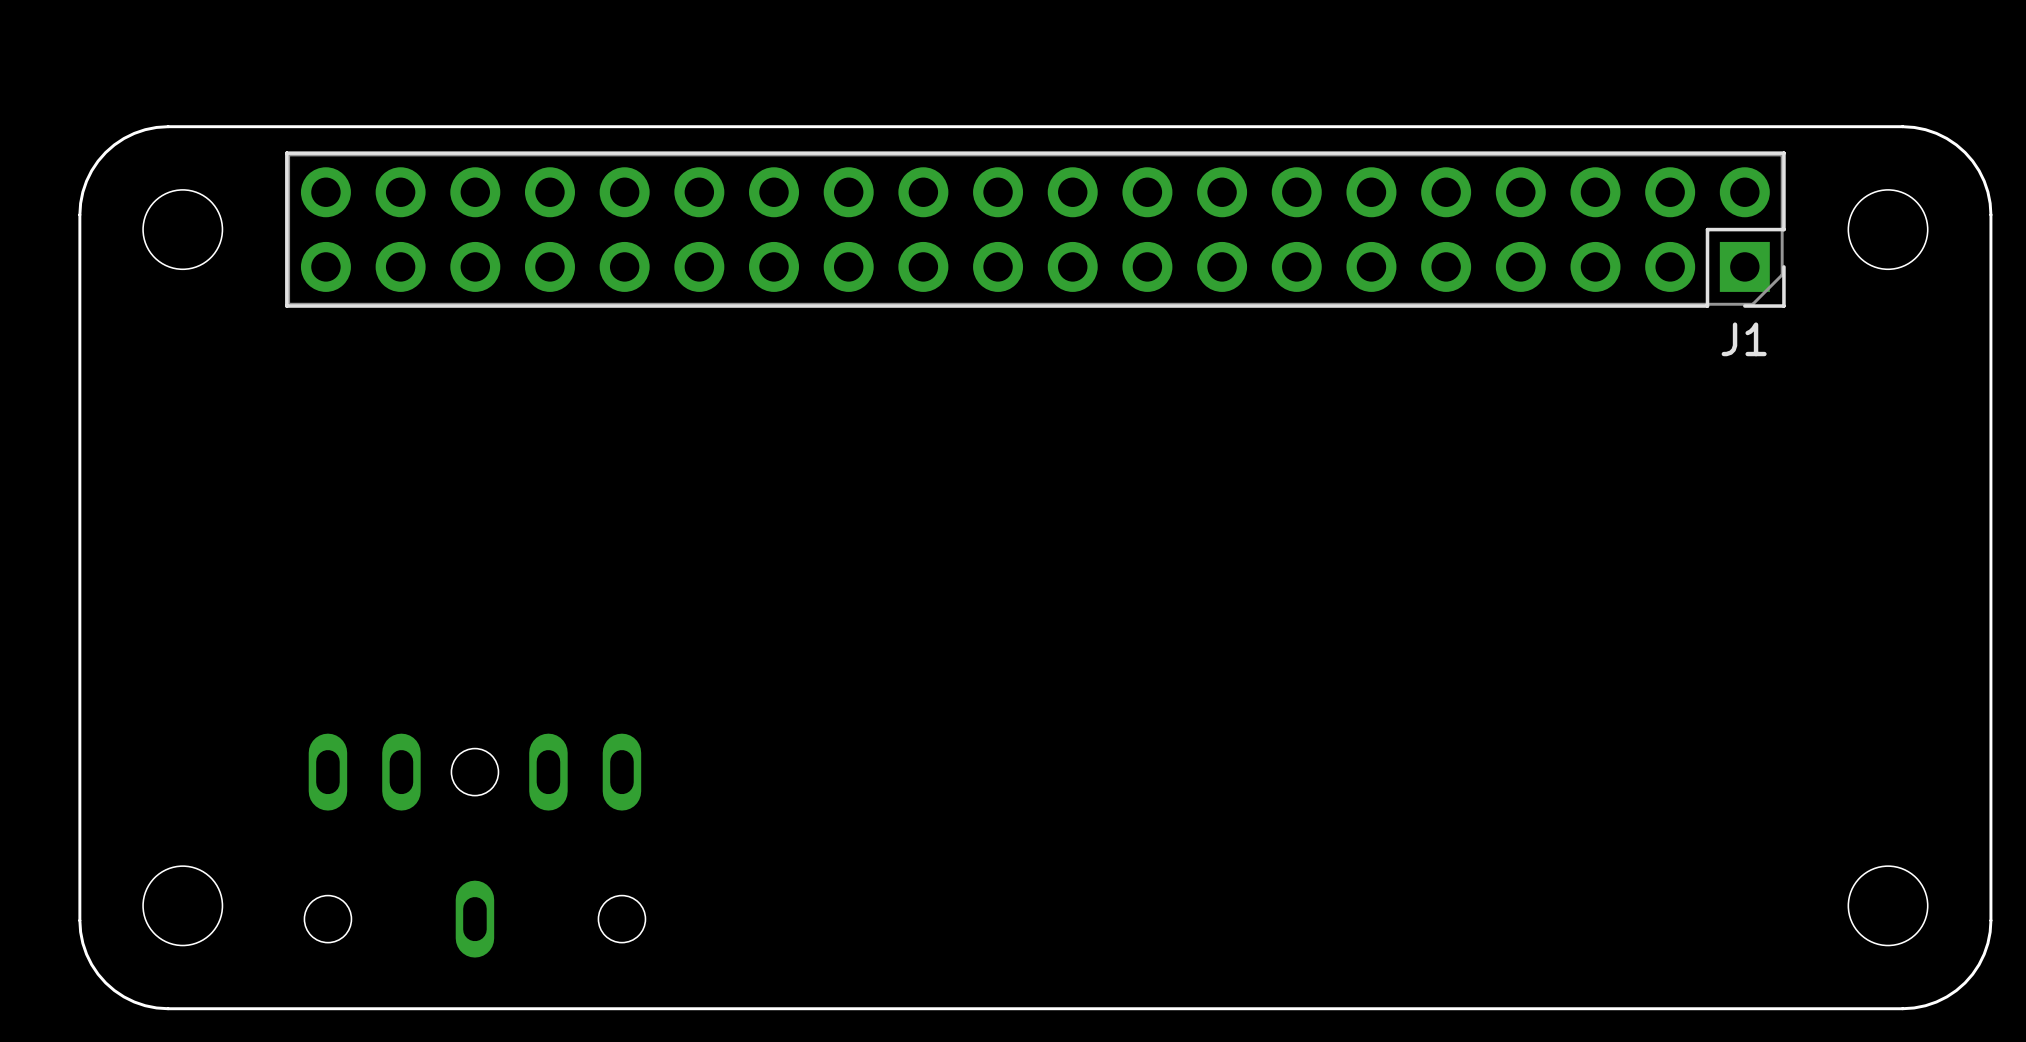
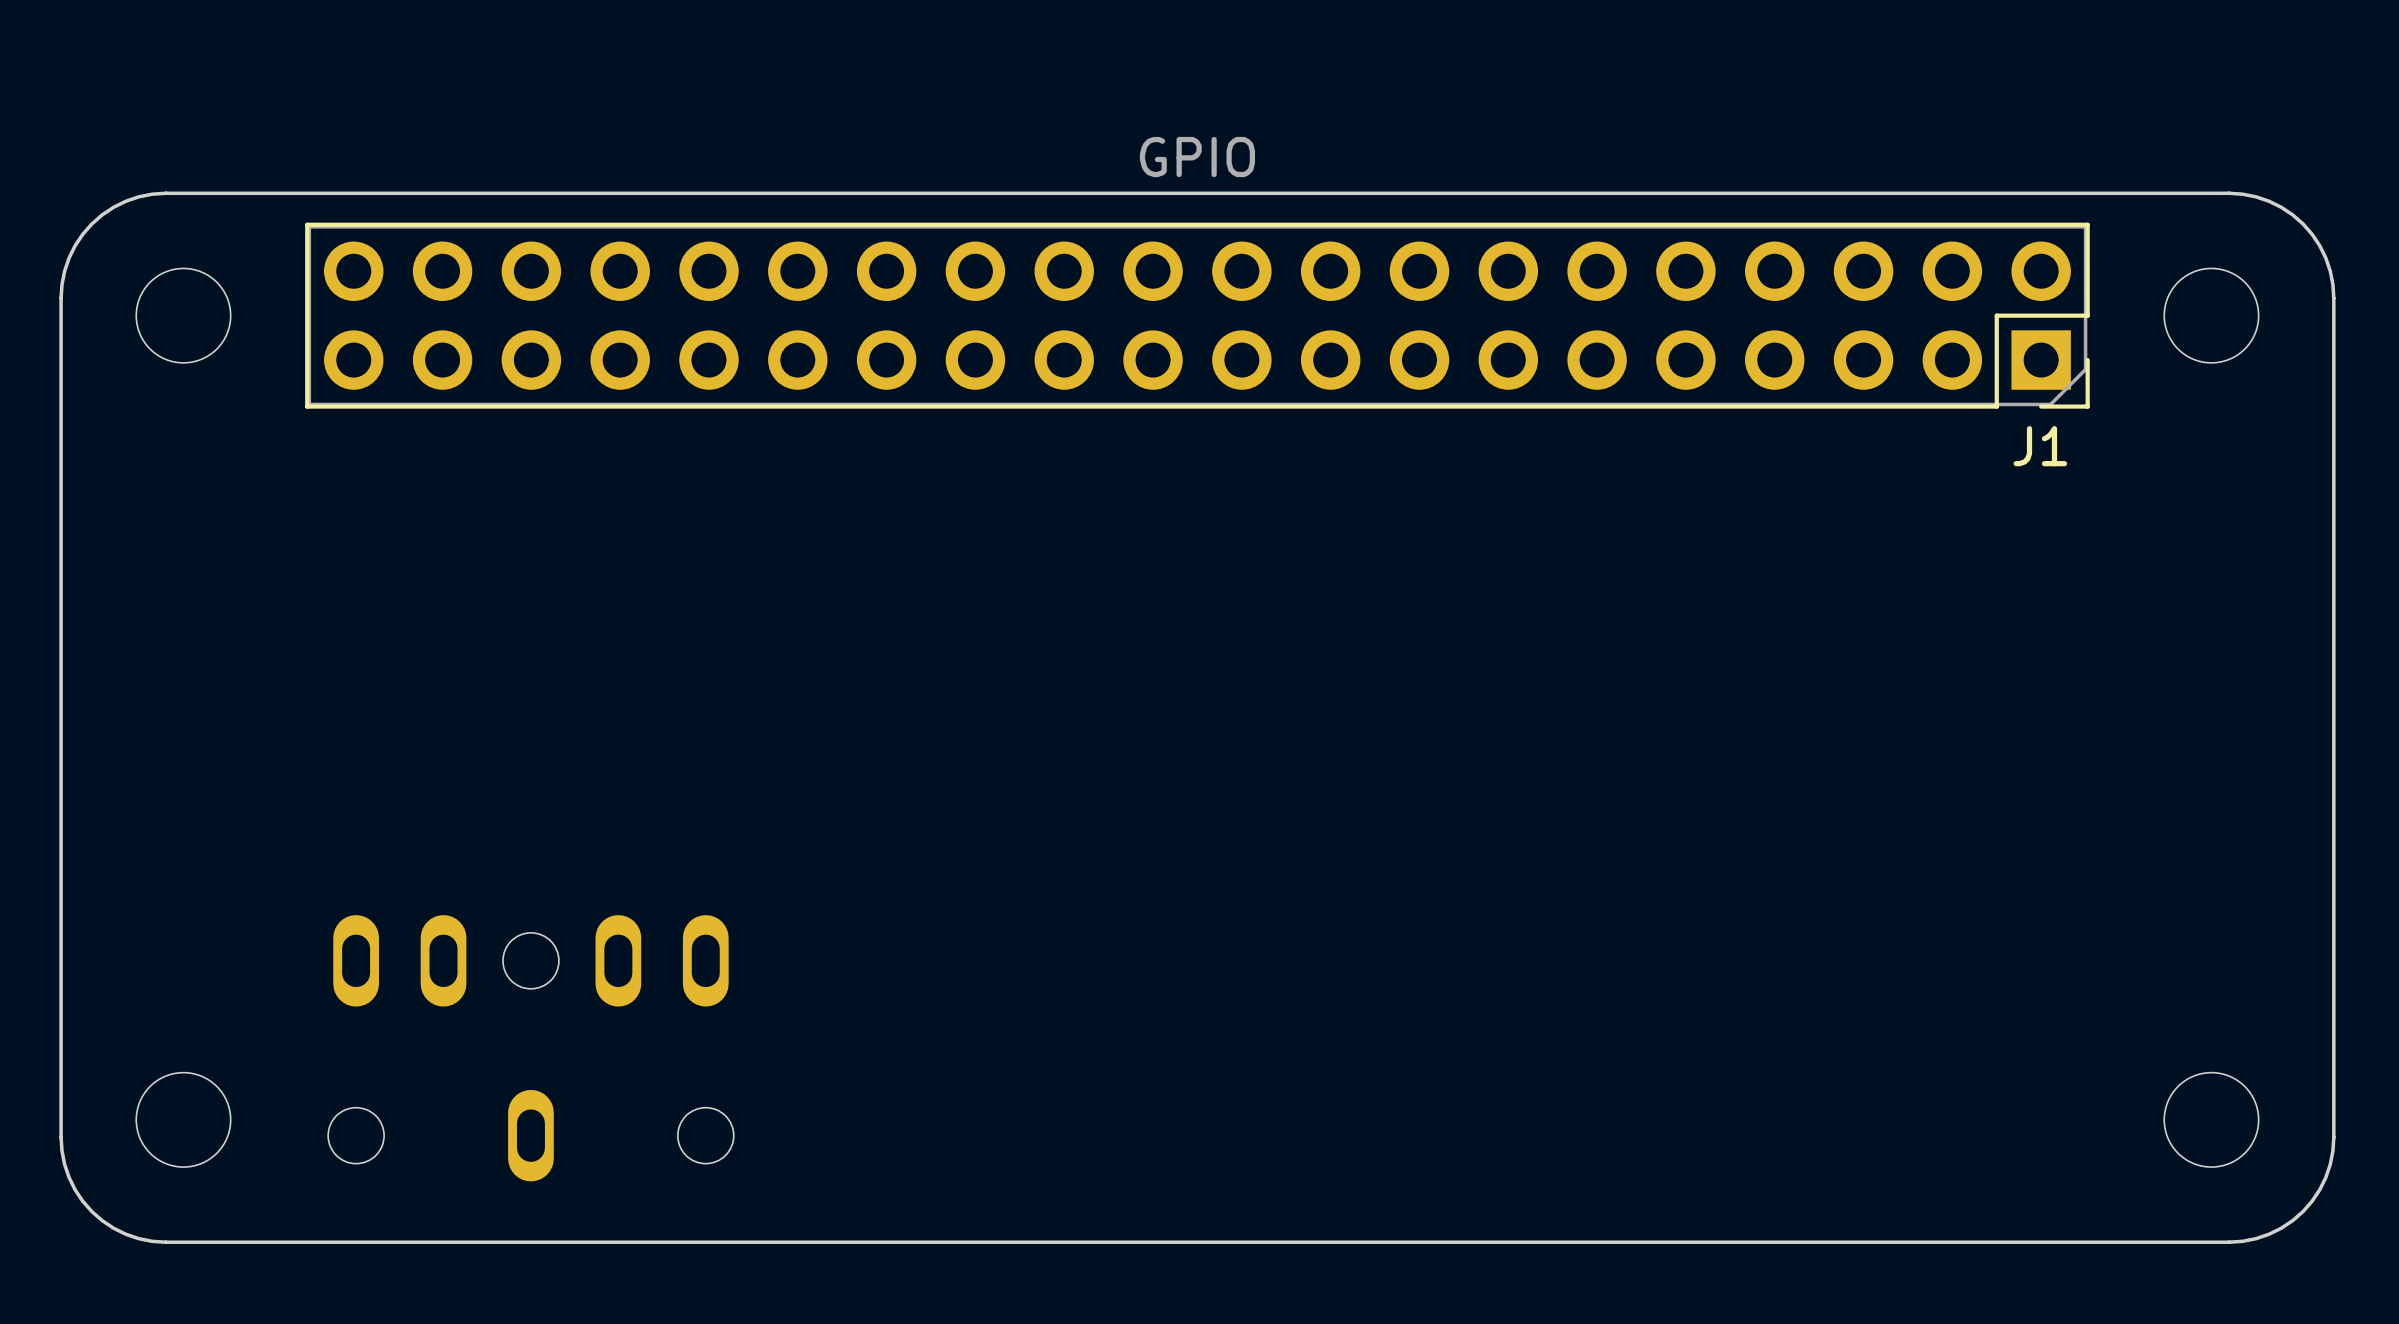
J1 value: none -> GPIO (1197, 157)

